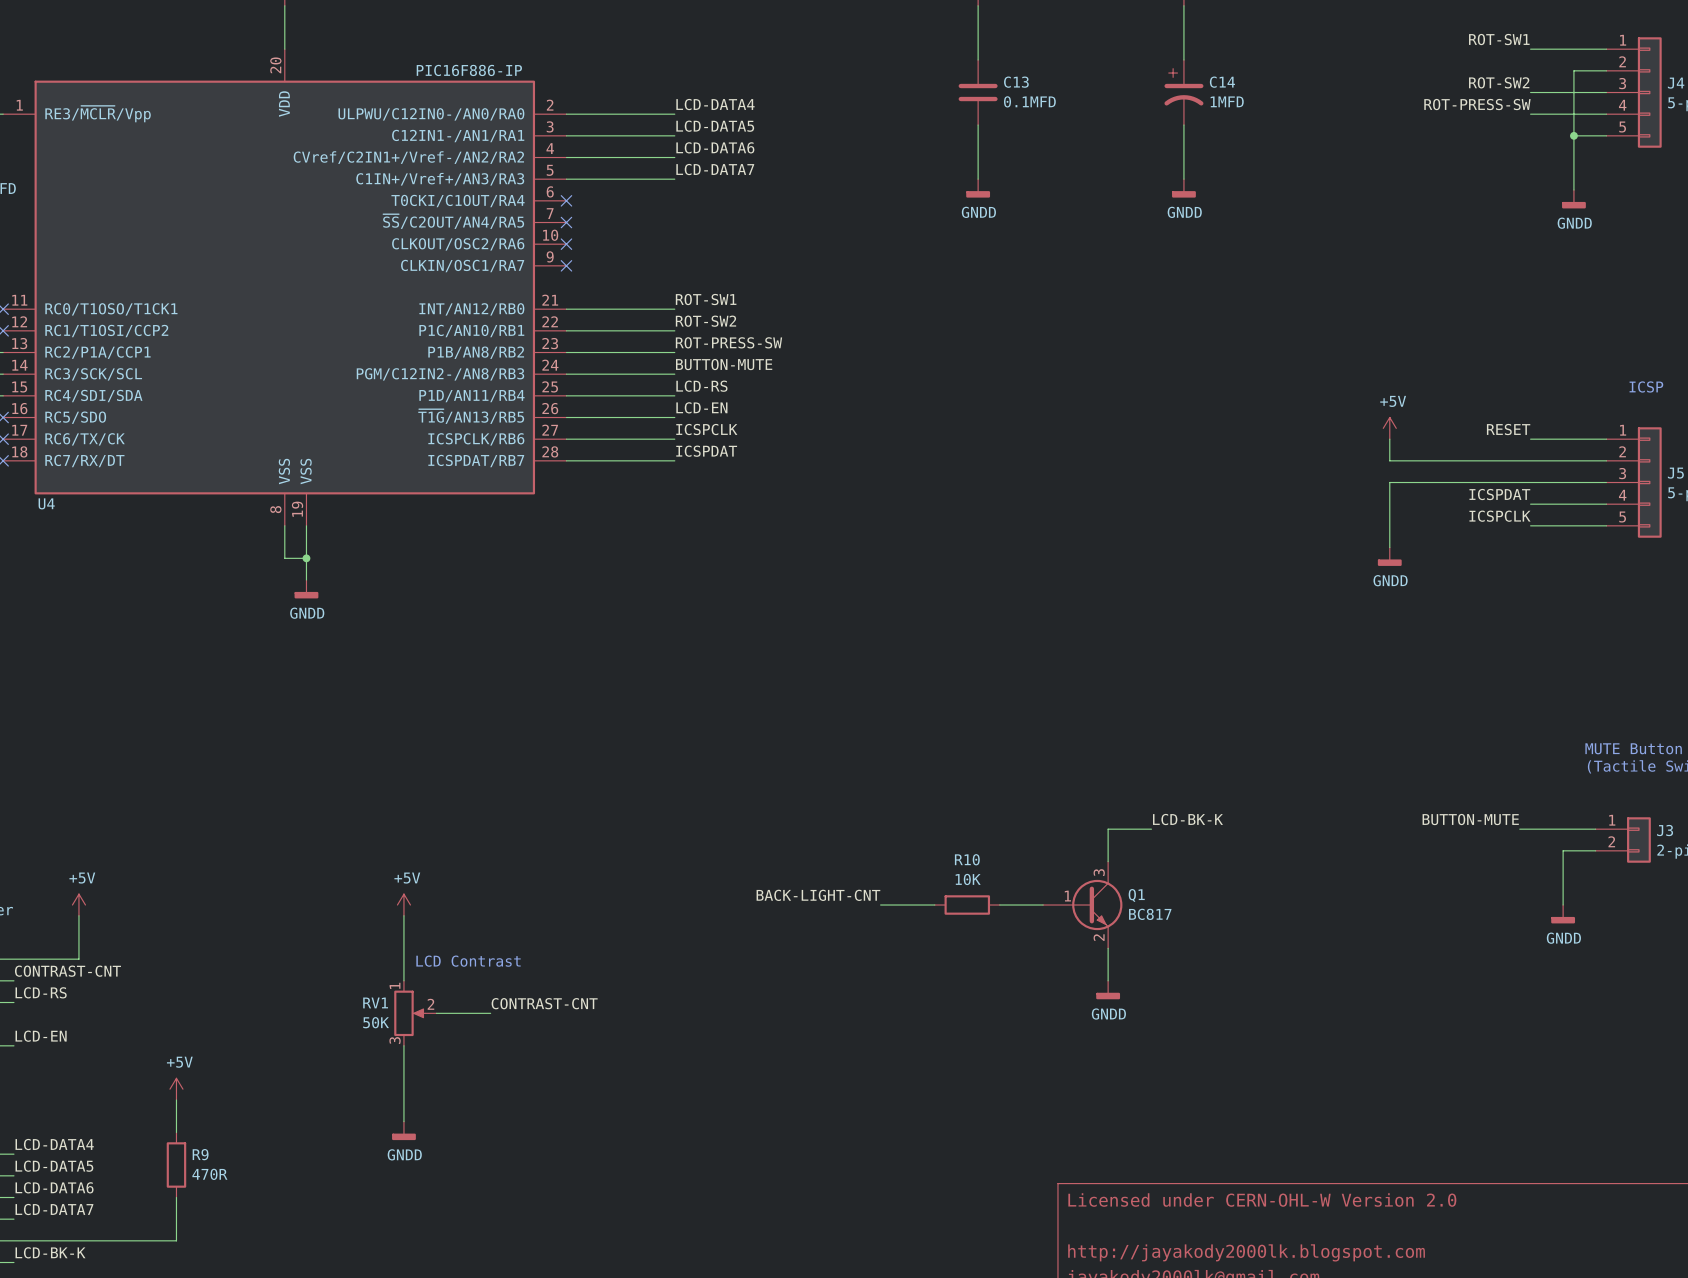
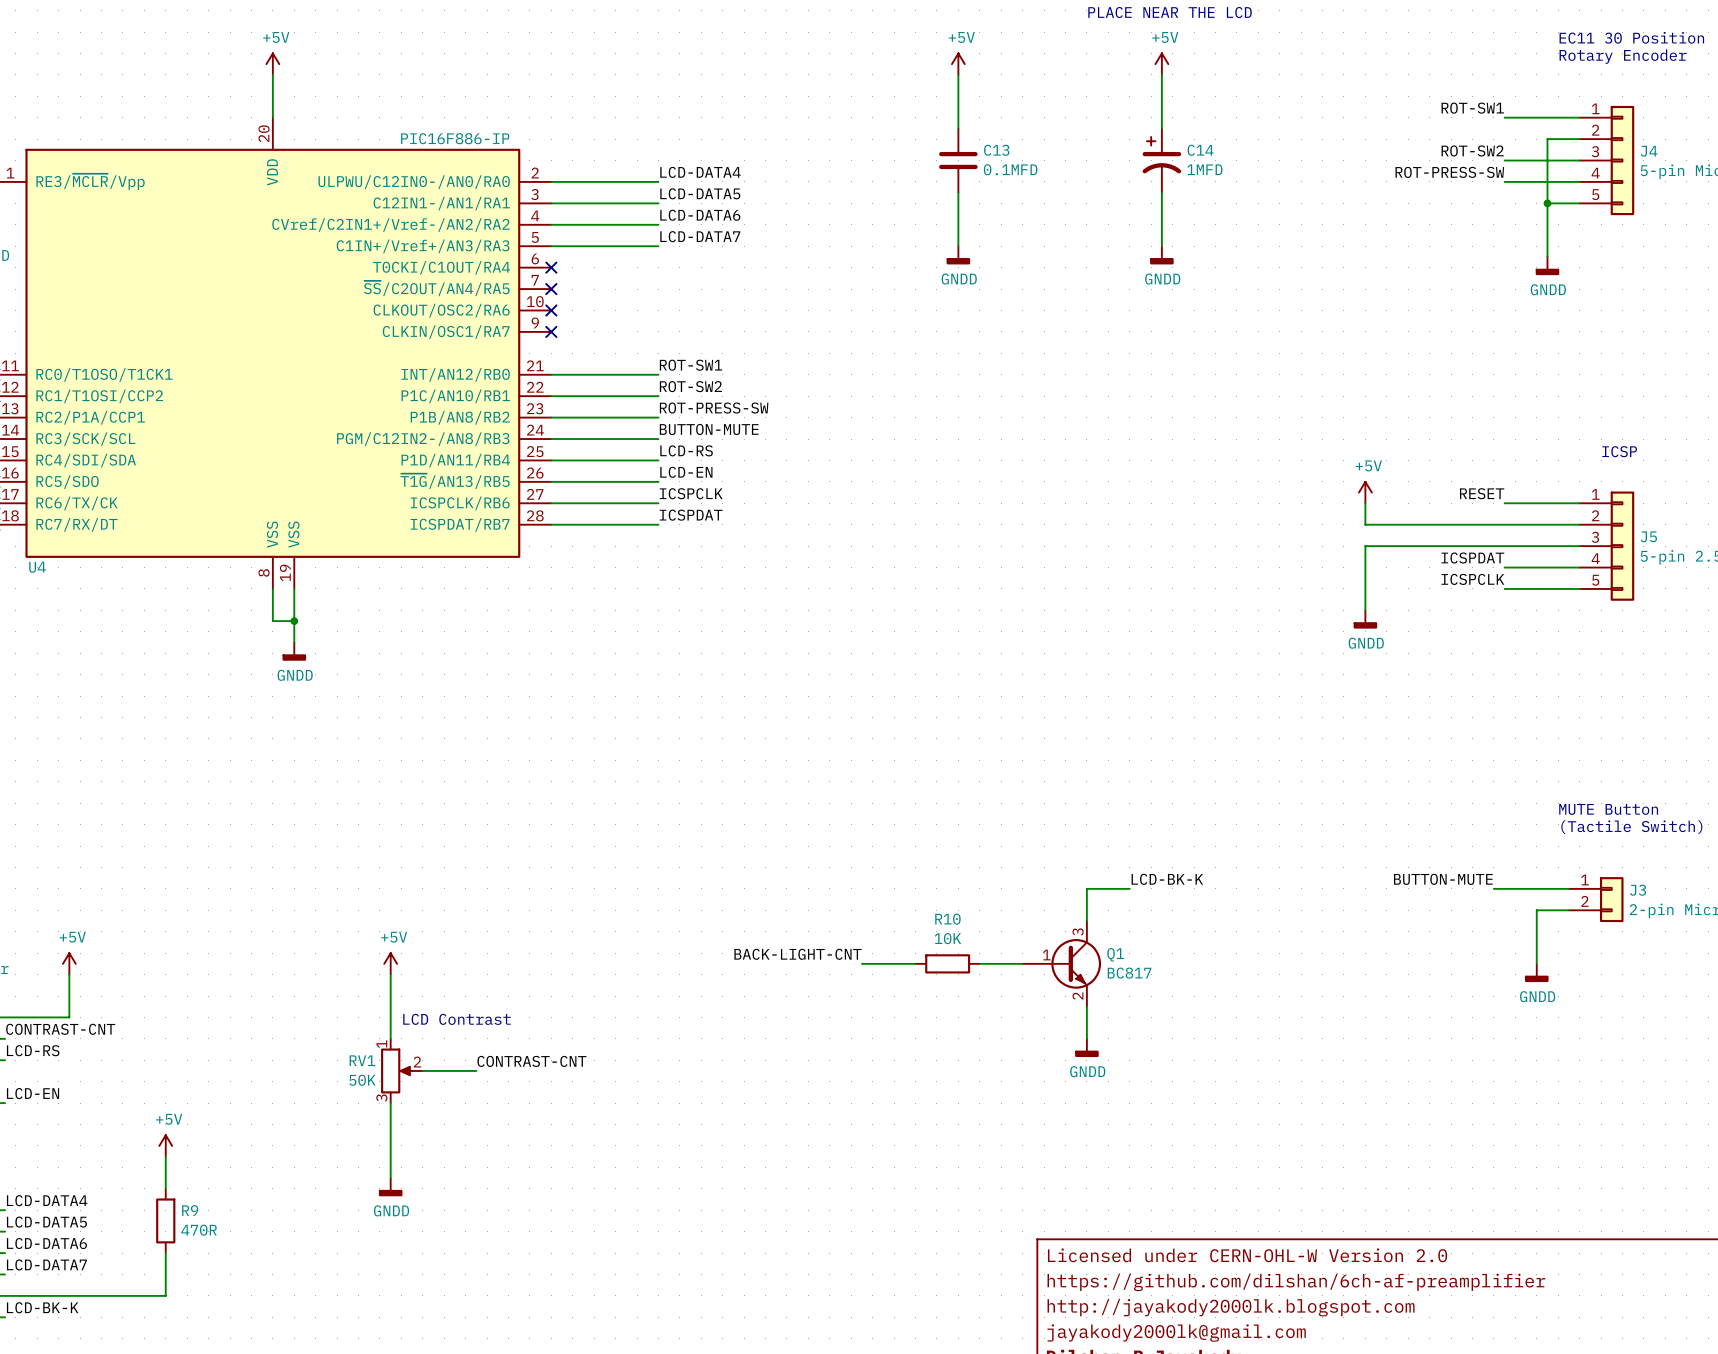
title block: none -> https://github.com/dilshan/6ch-af-preamplifier (1296, 1282)

